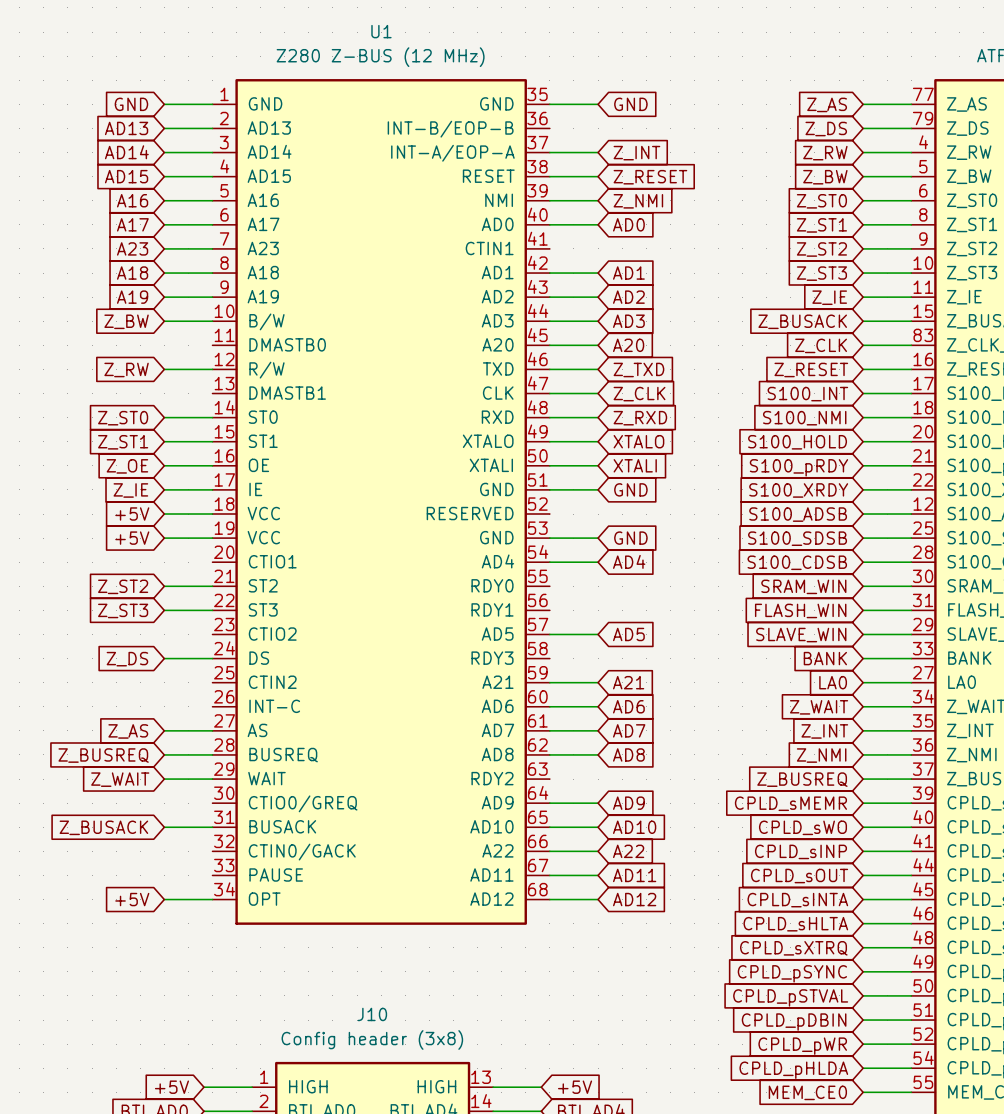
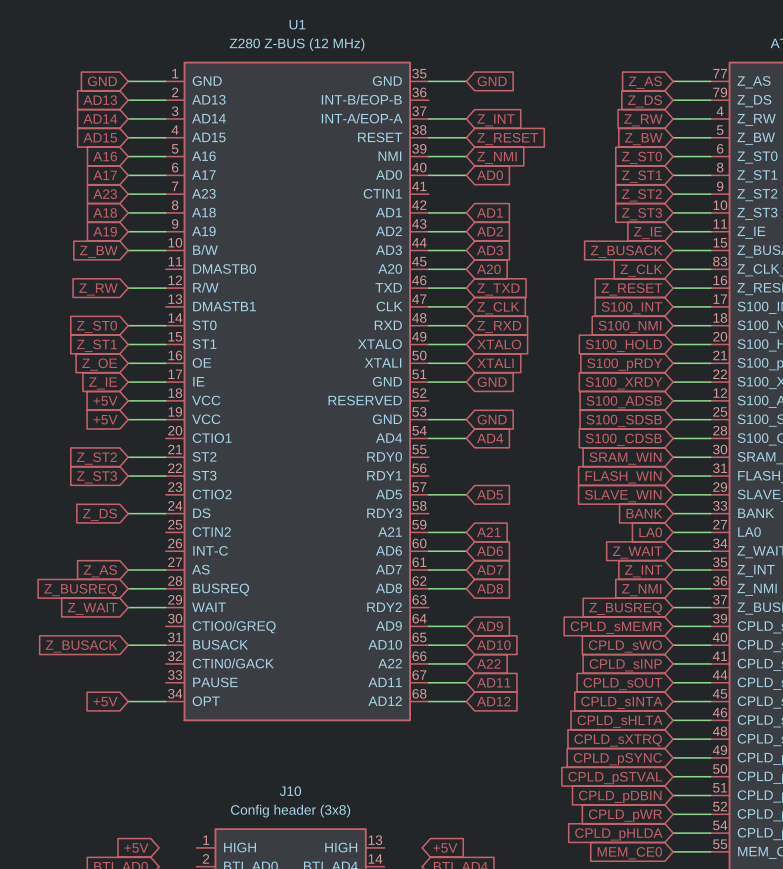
wire: (203, 1087) (252, 1087) -> none
wire: (493, 1087) (541, 1087) -> none
wire: (203, 1111) (252, 1111) -> none
wire: (493, 1111) (541, 1111) -> none

